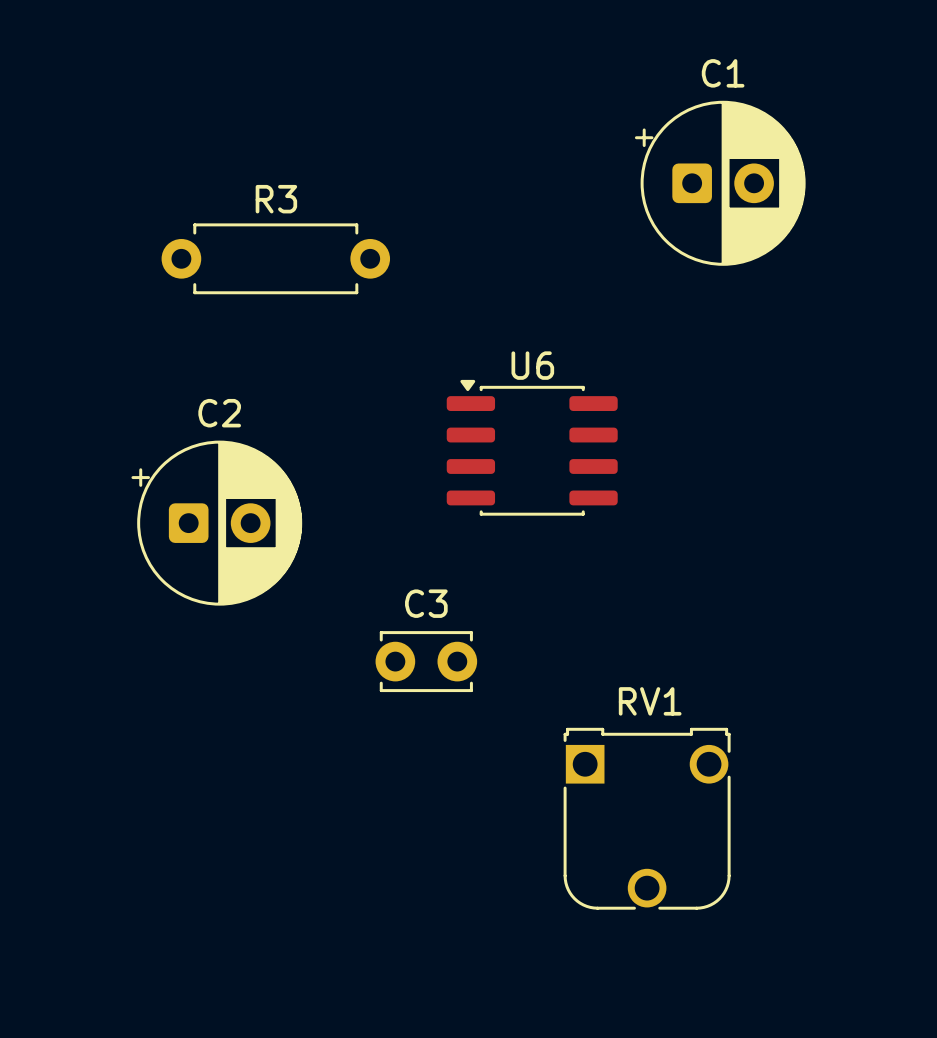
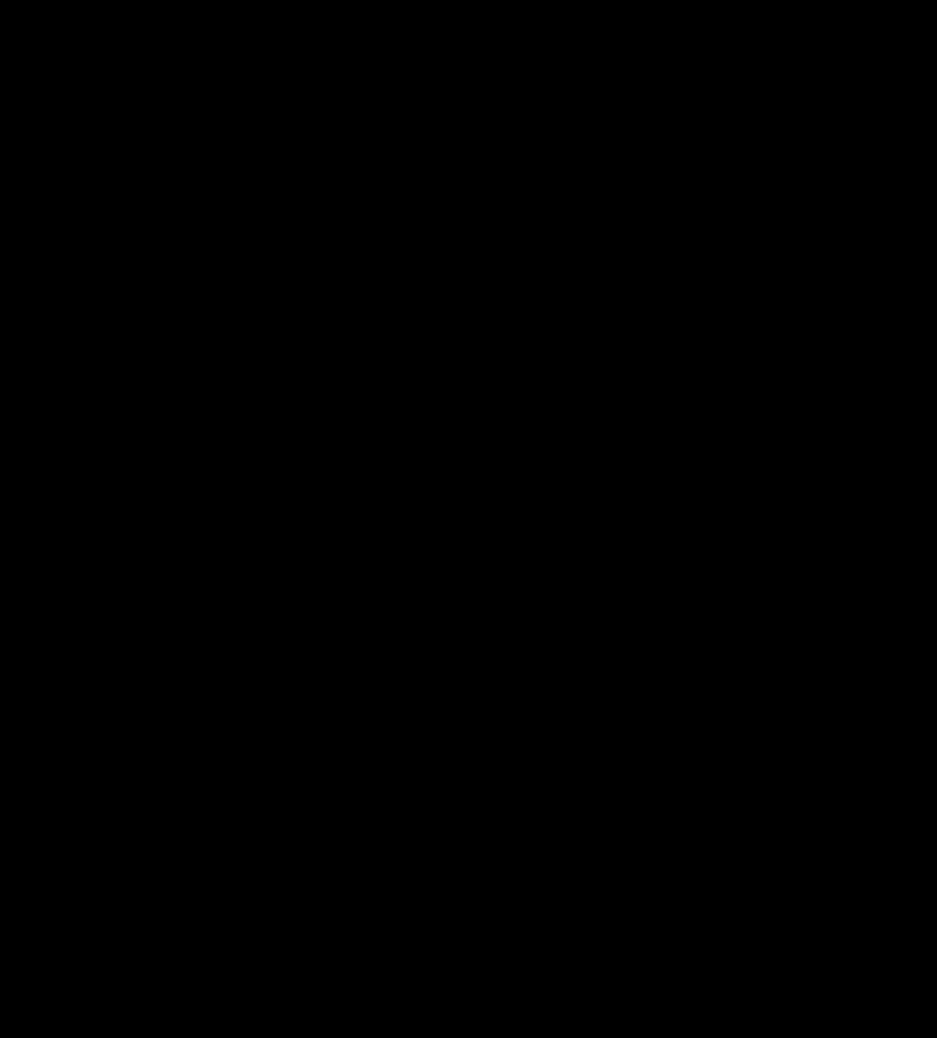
C1: (720, 183) -> none
R3: (275, 258) -> none
U6: (532, 447) -> none
C2: (216, 523) -> none
C3: (426, 661) -> none
RV1: (647, 818) -> none

